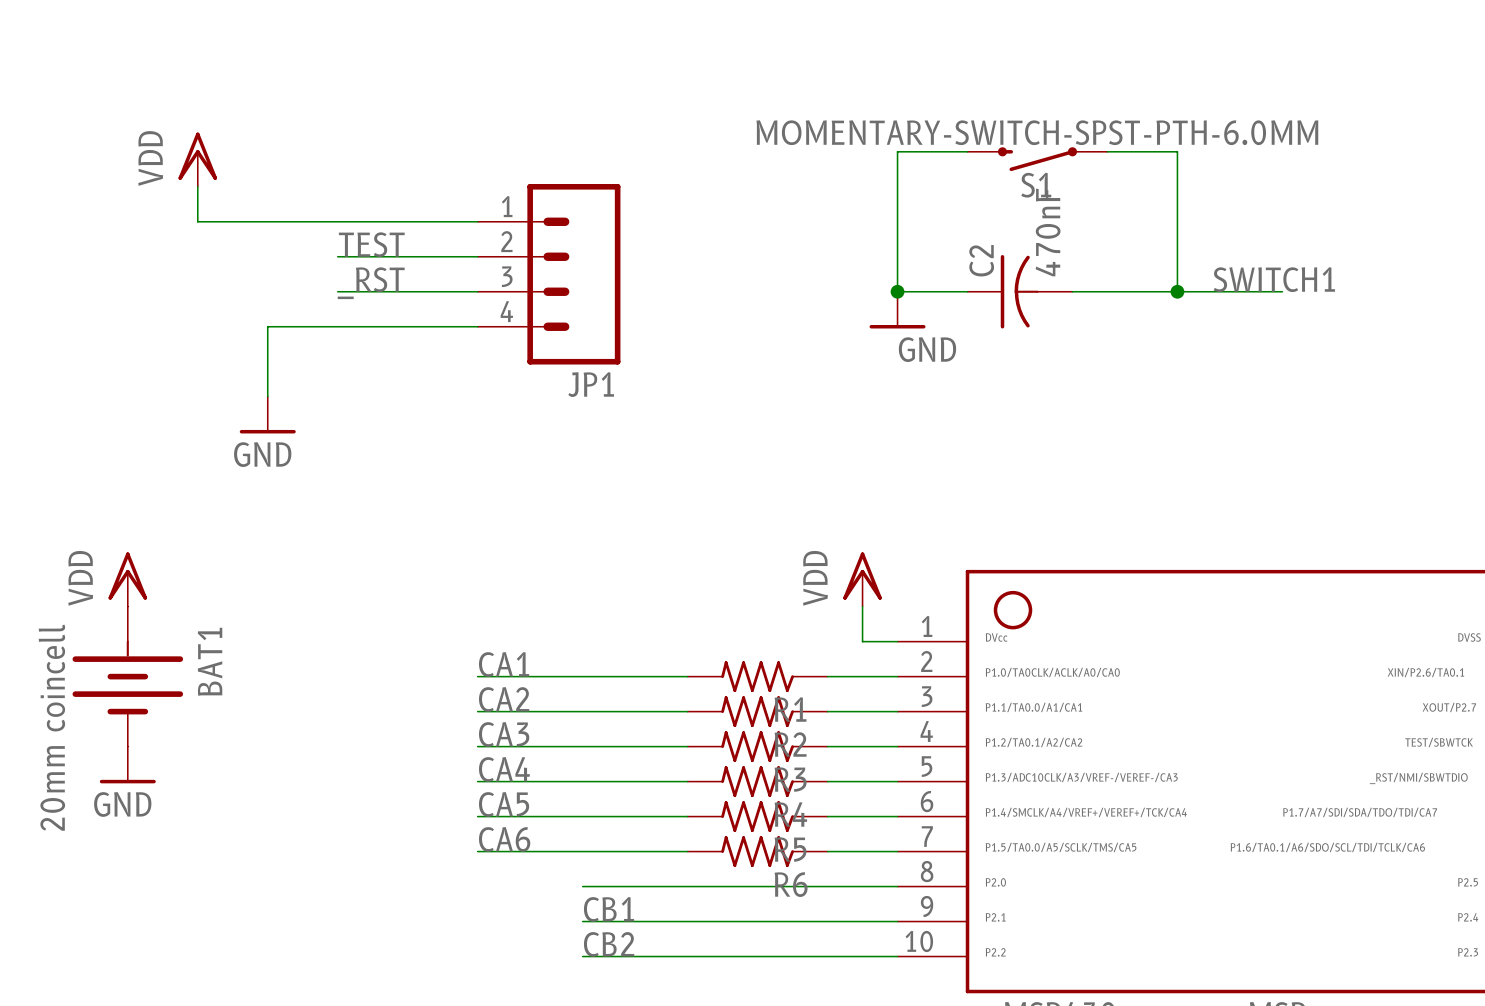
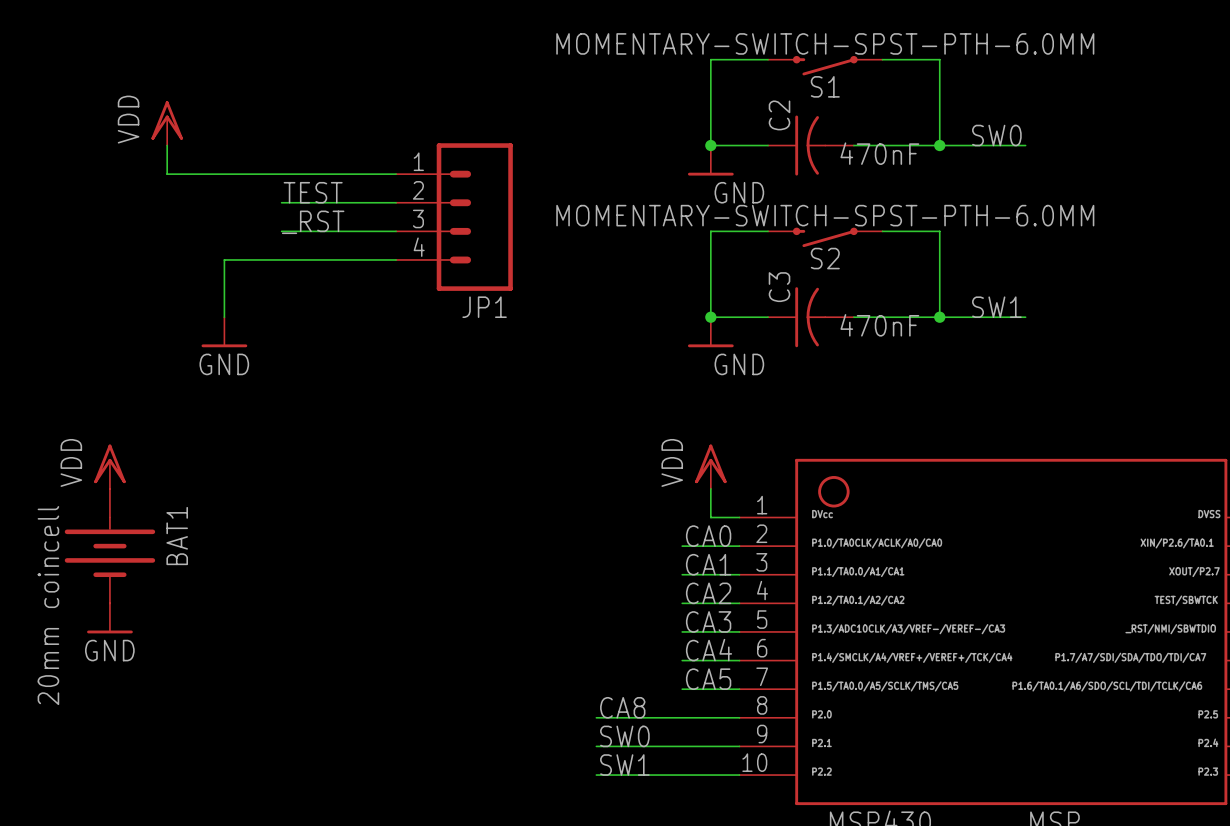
wire: none -> (768, 59) (710, 59) (710, 145) (768, 145)
wire: none -> (882, 59) (939, 59) (939, 145)
wire: (967, 151) (897, 151) (897, 291) -> (768, 317) (710, 317) (710, 231) (739, 231)
wire: (1107, 151) (1177, 151) (1177, 291) -> none
S1 position: (1037, 159) -> (825, 65)
label: none -> SW0 (996, 135)
junction: none -> (710, 145)
wire: none -> (853, 145) (1025, 145)
junction: none -> (939, 145)
power symbol: none -> GND (710, 160)
C2 value rotation: 0° (1048, 232) -> 90° clockwise (879, 153)
label: SWITCH1 (1274, 279) -> none
junction: (897, 291) -> none
C2 position: (1020, 291) -> (810, 145)
wire: (1142, 291) (1282, 291) -> (939, 231) (939, 317)
junction: (1177, 291) -> none
S2: none -> MOMENTARY-SWITCH-SPST-PTH-6.0MM (825, 237)
power symbol: GND (897, 310) -> none
label: none -> SW1 (996, 307)
junction: none -> (710, 317)
C3: none -> 470nF (810, 317)
wire: none -> (853, 317) (1025, 317)
junction: none -> (939, 317)
power symbol: none -> GND (710, 332)
label: CA1 (504, 664) -> none
label: none -> CA0 (708, 536)
wire: (477, 676) (687, 676) -> none
R1: (757, 676) -> none
label: CA2 (504, 699) -> none
label: none -> CA1 (708, 564)
wire: (477, 711) (687, 711) -> none
R2: (757, 711) -> none
label: CA3 (504, 734) -> none
label: none -> CA2 (708, 593)
wire: (477, 746) (687, 746) -> none
R3: (757, 746) -> none
label: CA4 (504, 769) -> none
label: none -> CA3 (708, 621)
wire: (477, 781) (687, 781) -> none
R4: (757, 781) -> none
label: CA5 (504, 804) -> none
label: none -> CA4 (709, 650)
wire: (477, 816) (687, 816) -> none
R5: (757, 816) -> none
label: CA6 (504, 839) -> none
label: none -> CA5 (708, 679)
wire: (477, 851) (687, 851) -> none
R6: (757, 851) -> none
label: none -> CA8 (622, 707)
wire: (582, 886) (722, 886) -> none
label: CB1 (609, 909) -> none
label: none -> SW0 (624, 736)
wire: (582, 921) (722, 921) -> none
label: CB2 (609, 944) -> none
label: none -> SW1 (624, 765)
wire: (582, 956) (722, 956) -> none

